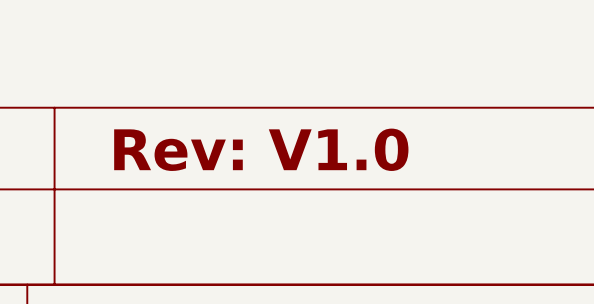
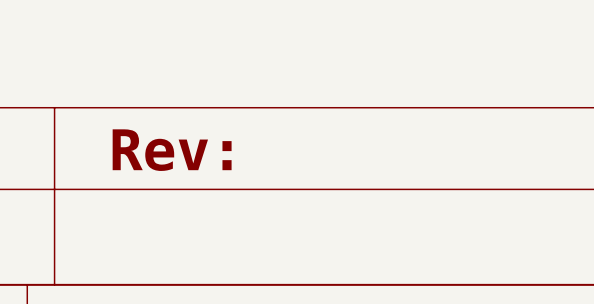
title block: Rev: V1.0 (261, 149) -> Rev: (172, 150)

